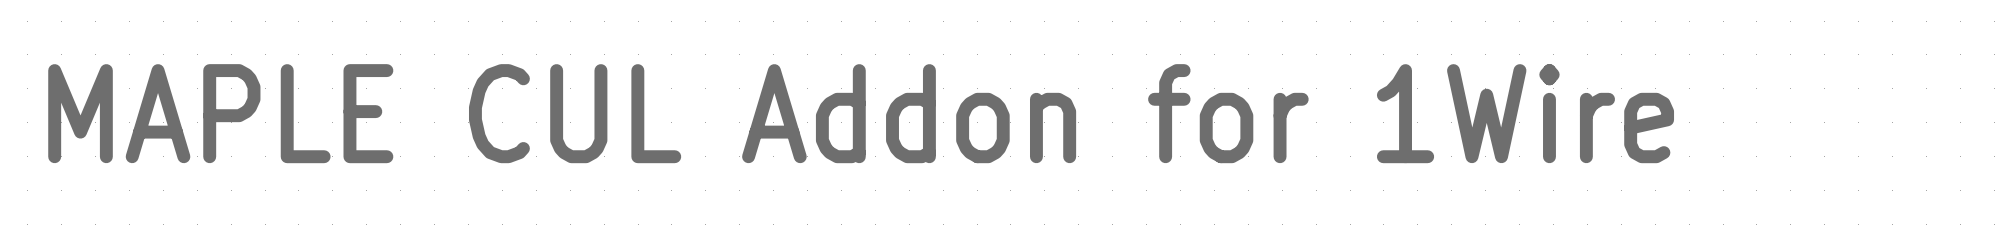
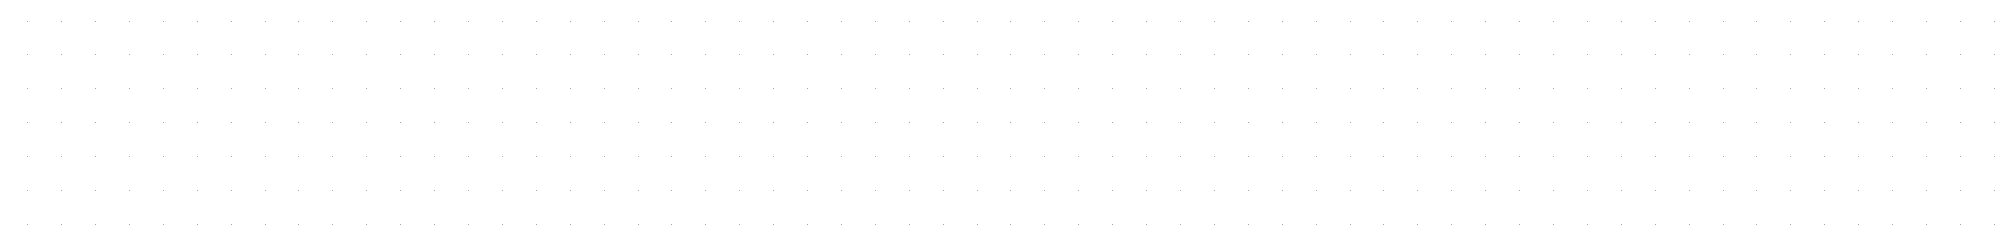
text: MAPLE CUL Addon for 1Wire (861, 113) -> none

